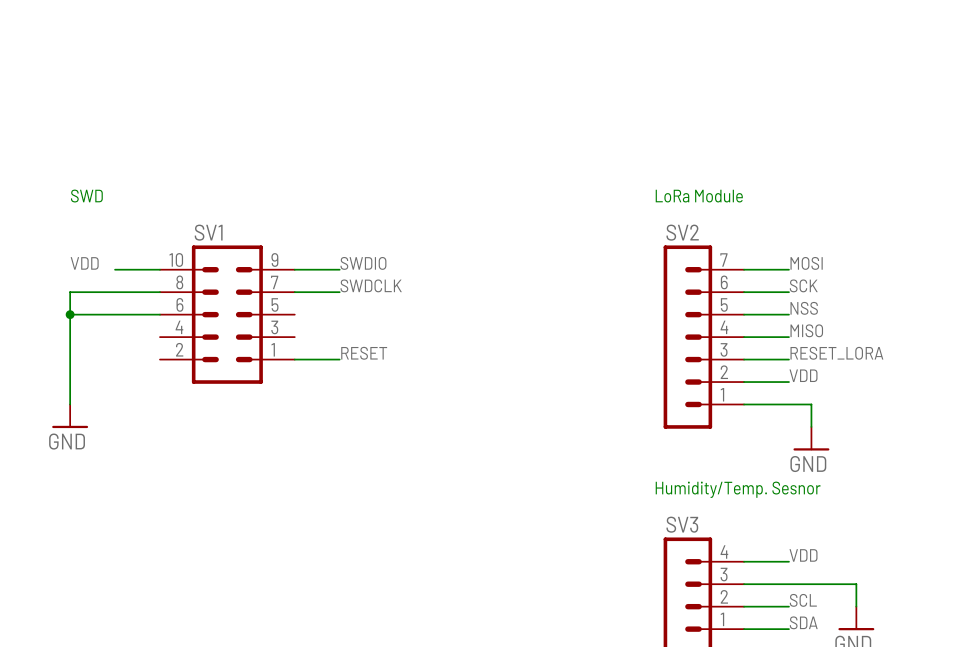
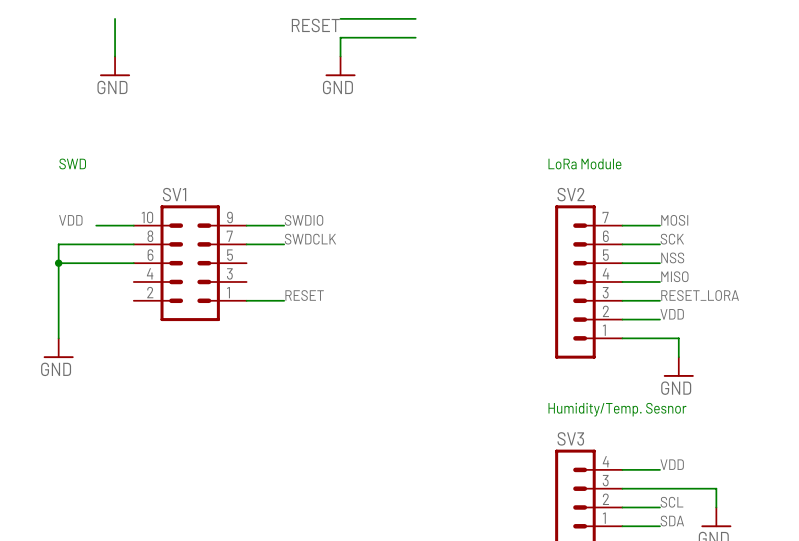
wire: none -> (115, 18) (115, 56)
wire: none -> (340, 18) (415, 18)
label: none -> RESET (315, 25)
wire: none -> (415, 37) (340, 37) (340, 56)
power symbol: none -> GND (115, 66)
power symbol: none -> GND (340, 66)

